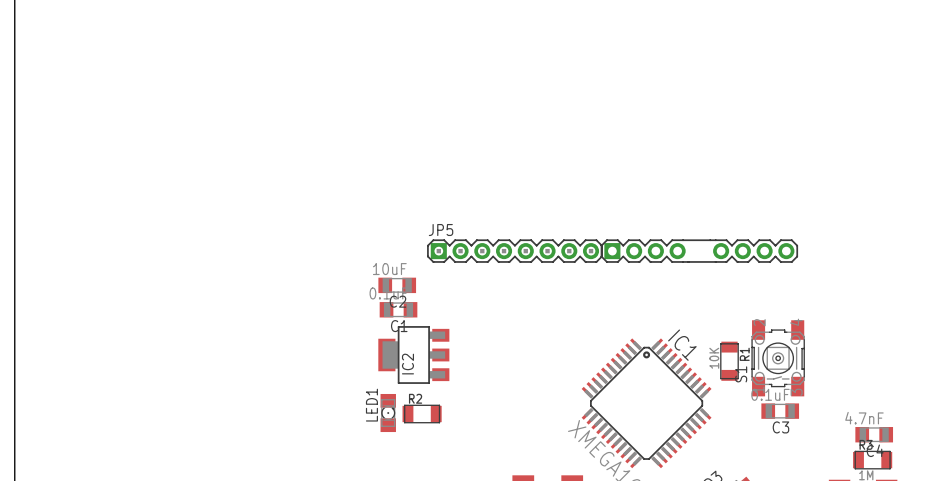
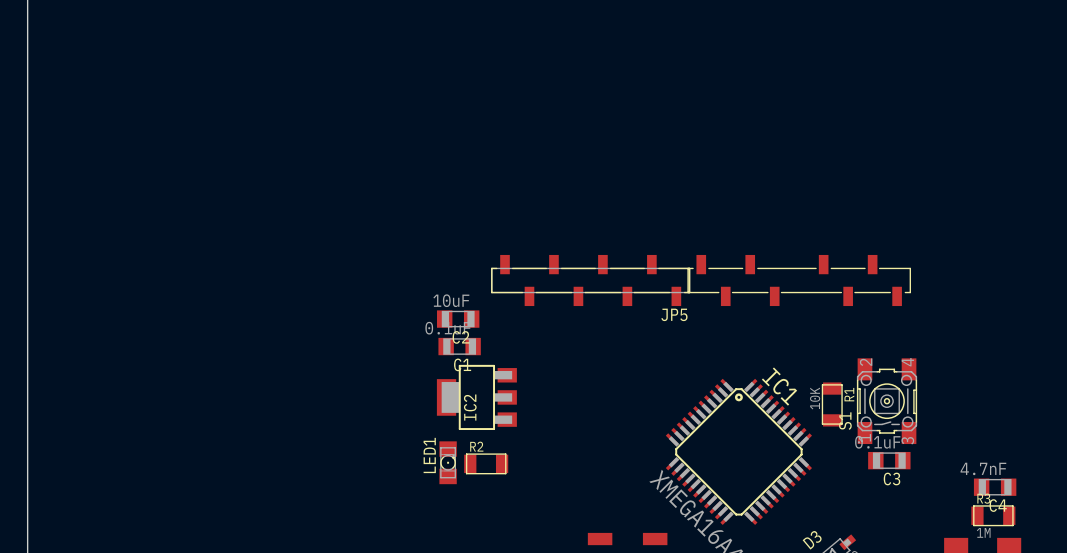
JP5 name position: JP5 (441, 230) -> JP5 (674, 314)
JP5 footprint: [427, 239, 603, 263] -> [491, 254, 691, 307]
part footprint: [600, 239, 799, 263] -> [687, 254, 911, 307]

